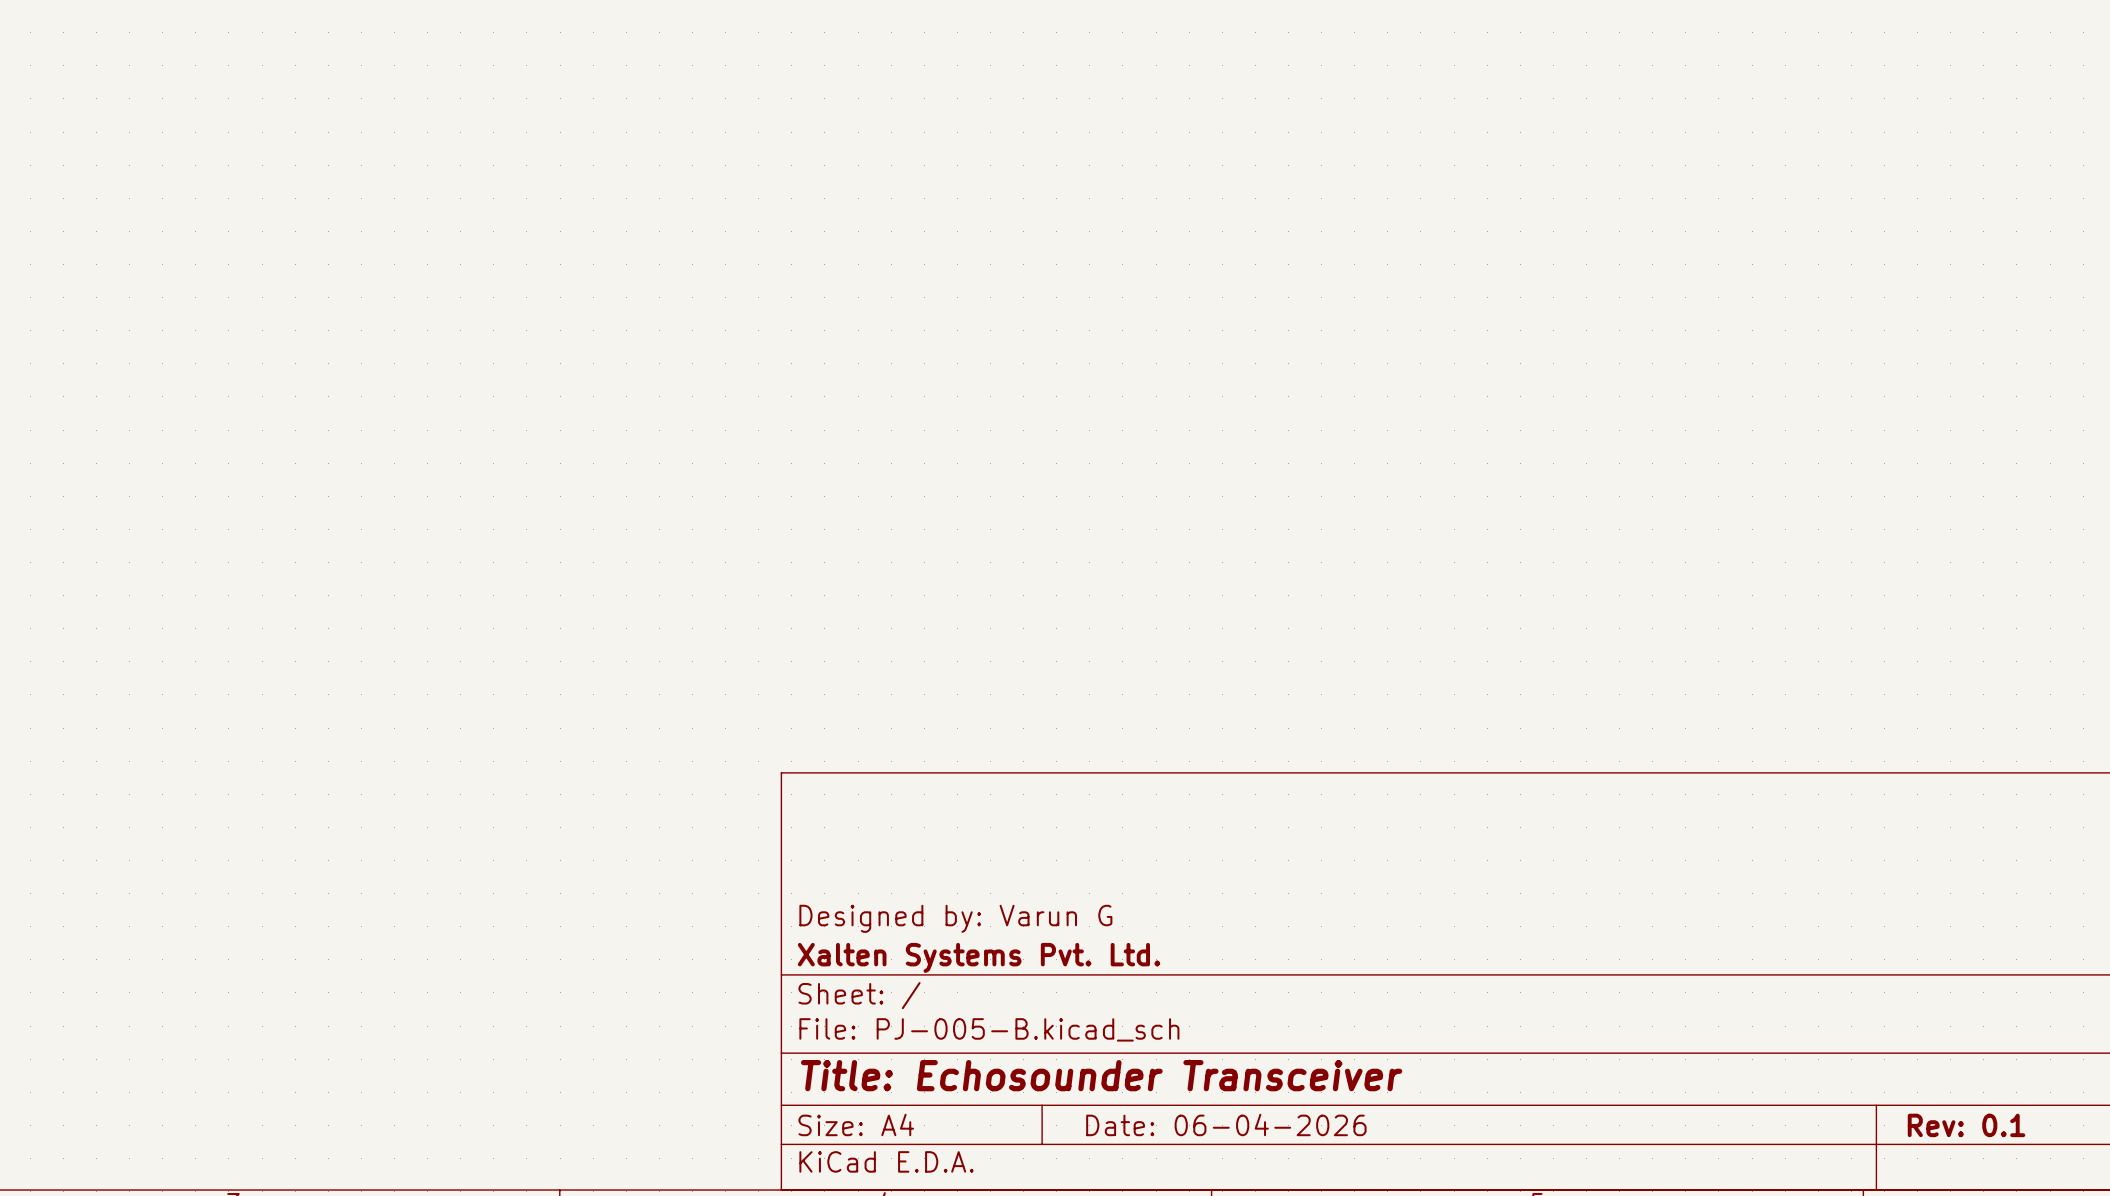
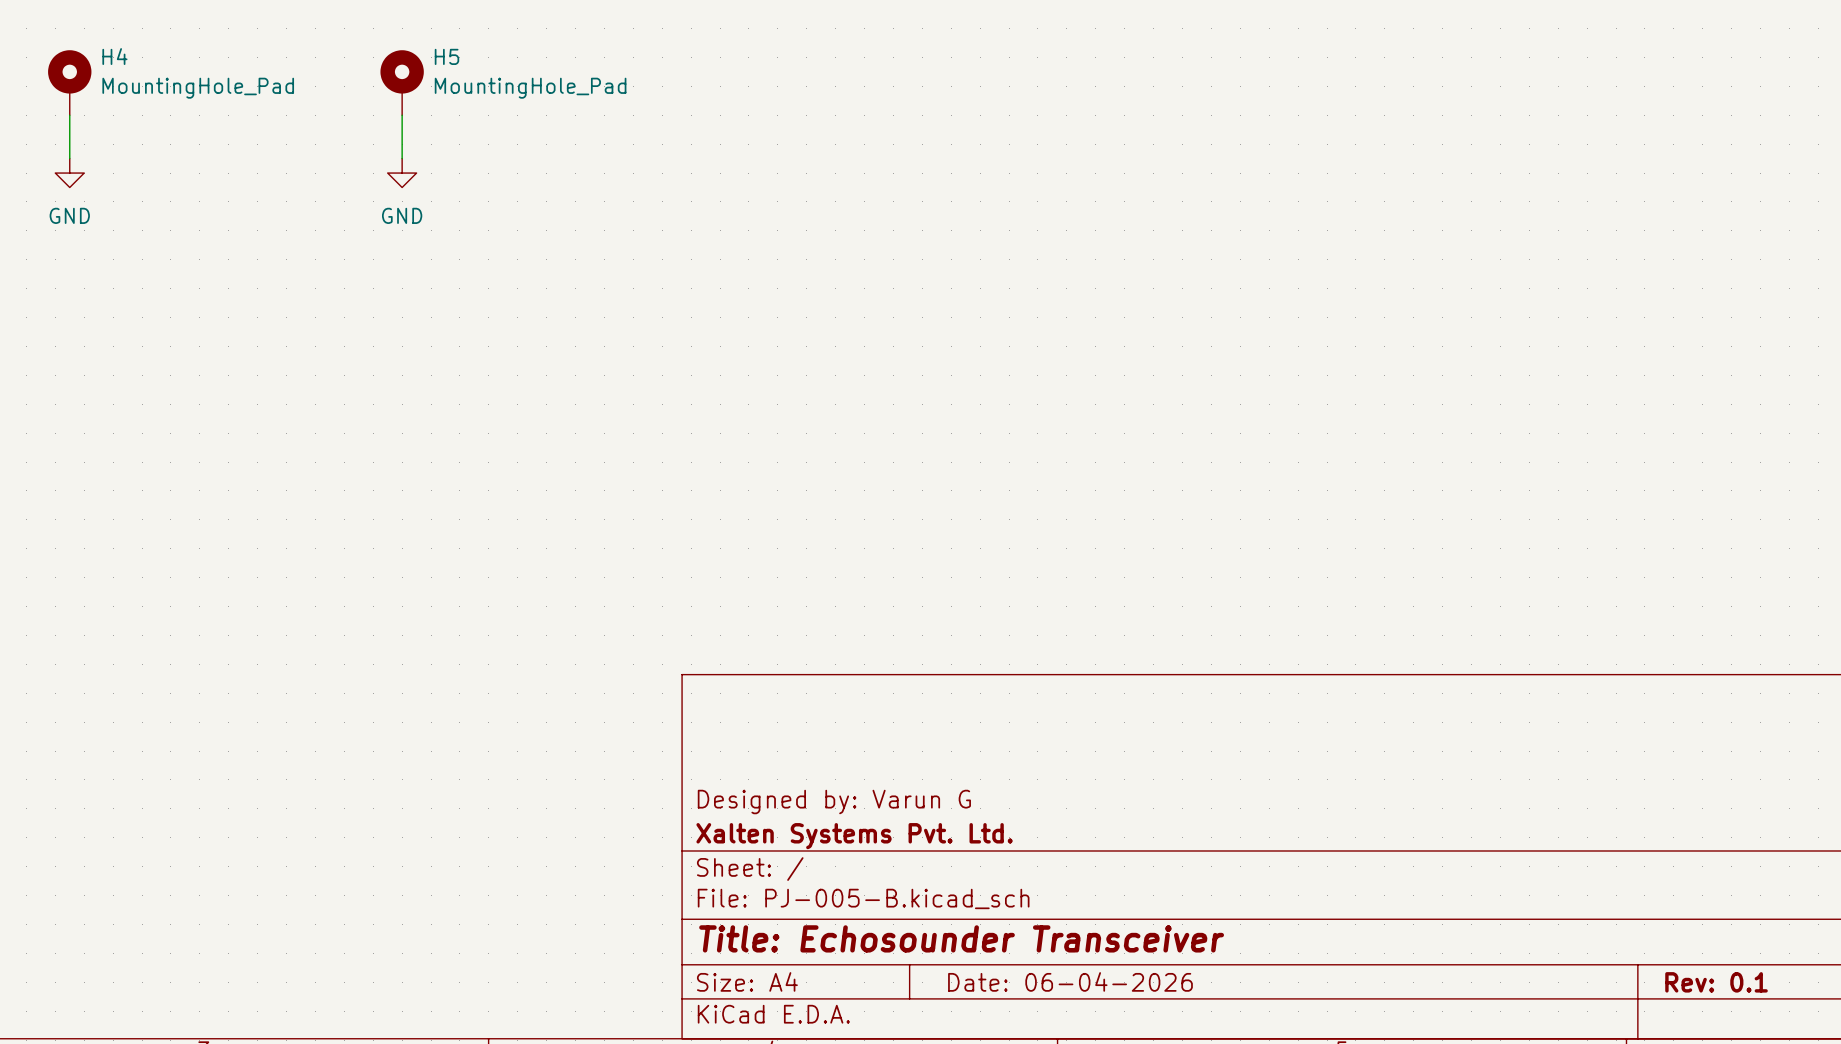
H4: none -> MountingHole_Pad (69, 82)
H5: none -> MountingHole_Pad (402, 82)
wire: none -> (69, 115) (69, 158)
wire: none -> (402, 115) (402, 158)
power symbol: none -> GND (69, 173)
power symbol: none -> GND (402, 173)

